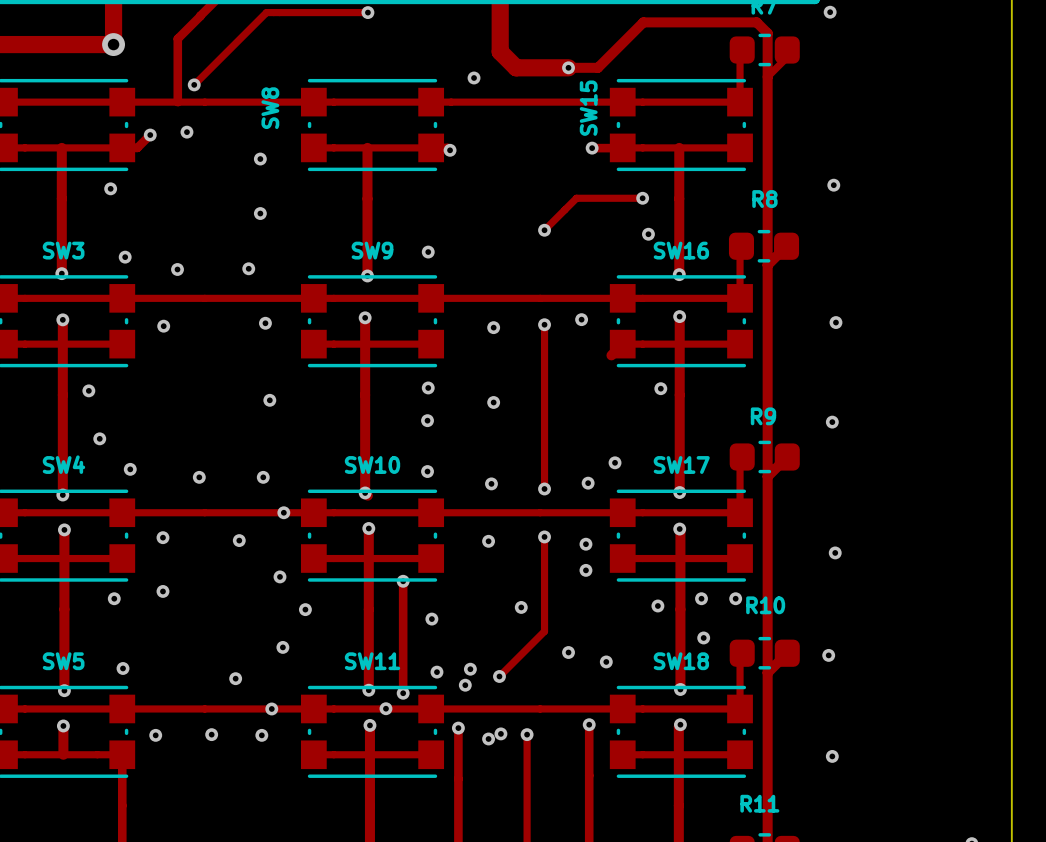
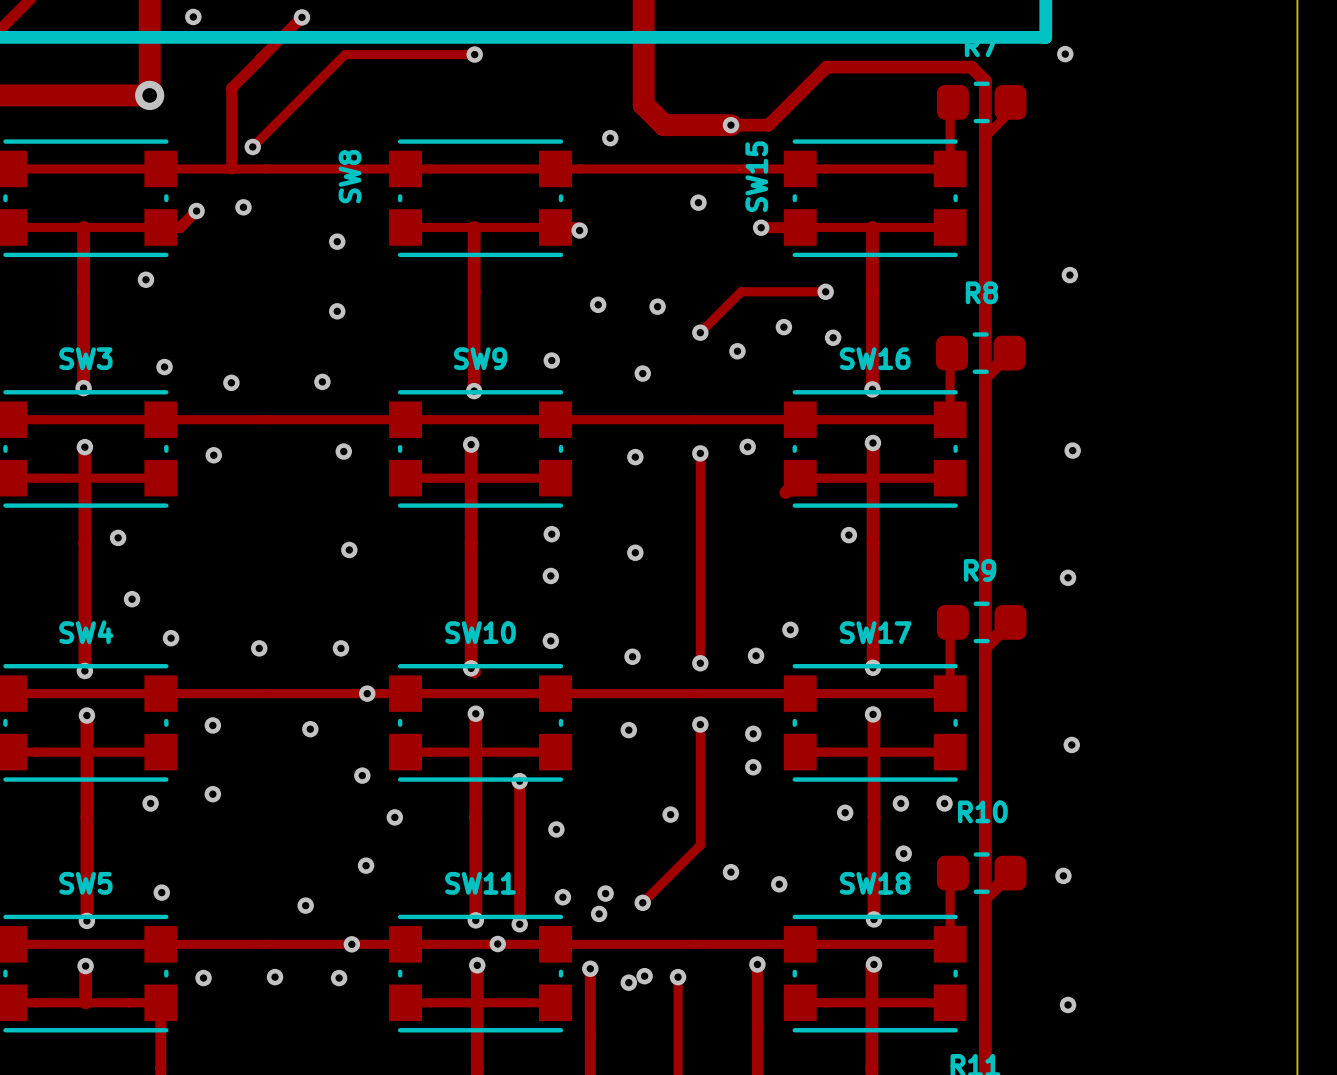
via: none -> (698, 202)
via: none -> (598, 304)
via: none -> (657, 306)
via: none -> (783, 327)
via: none -> (737, 351)
via: none -> (642, 373)

